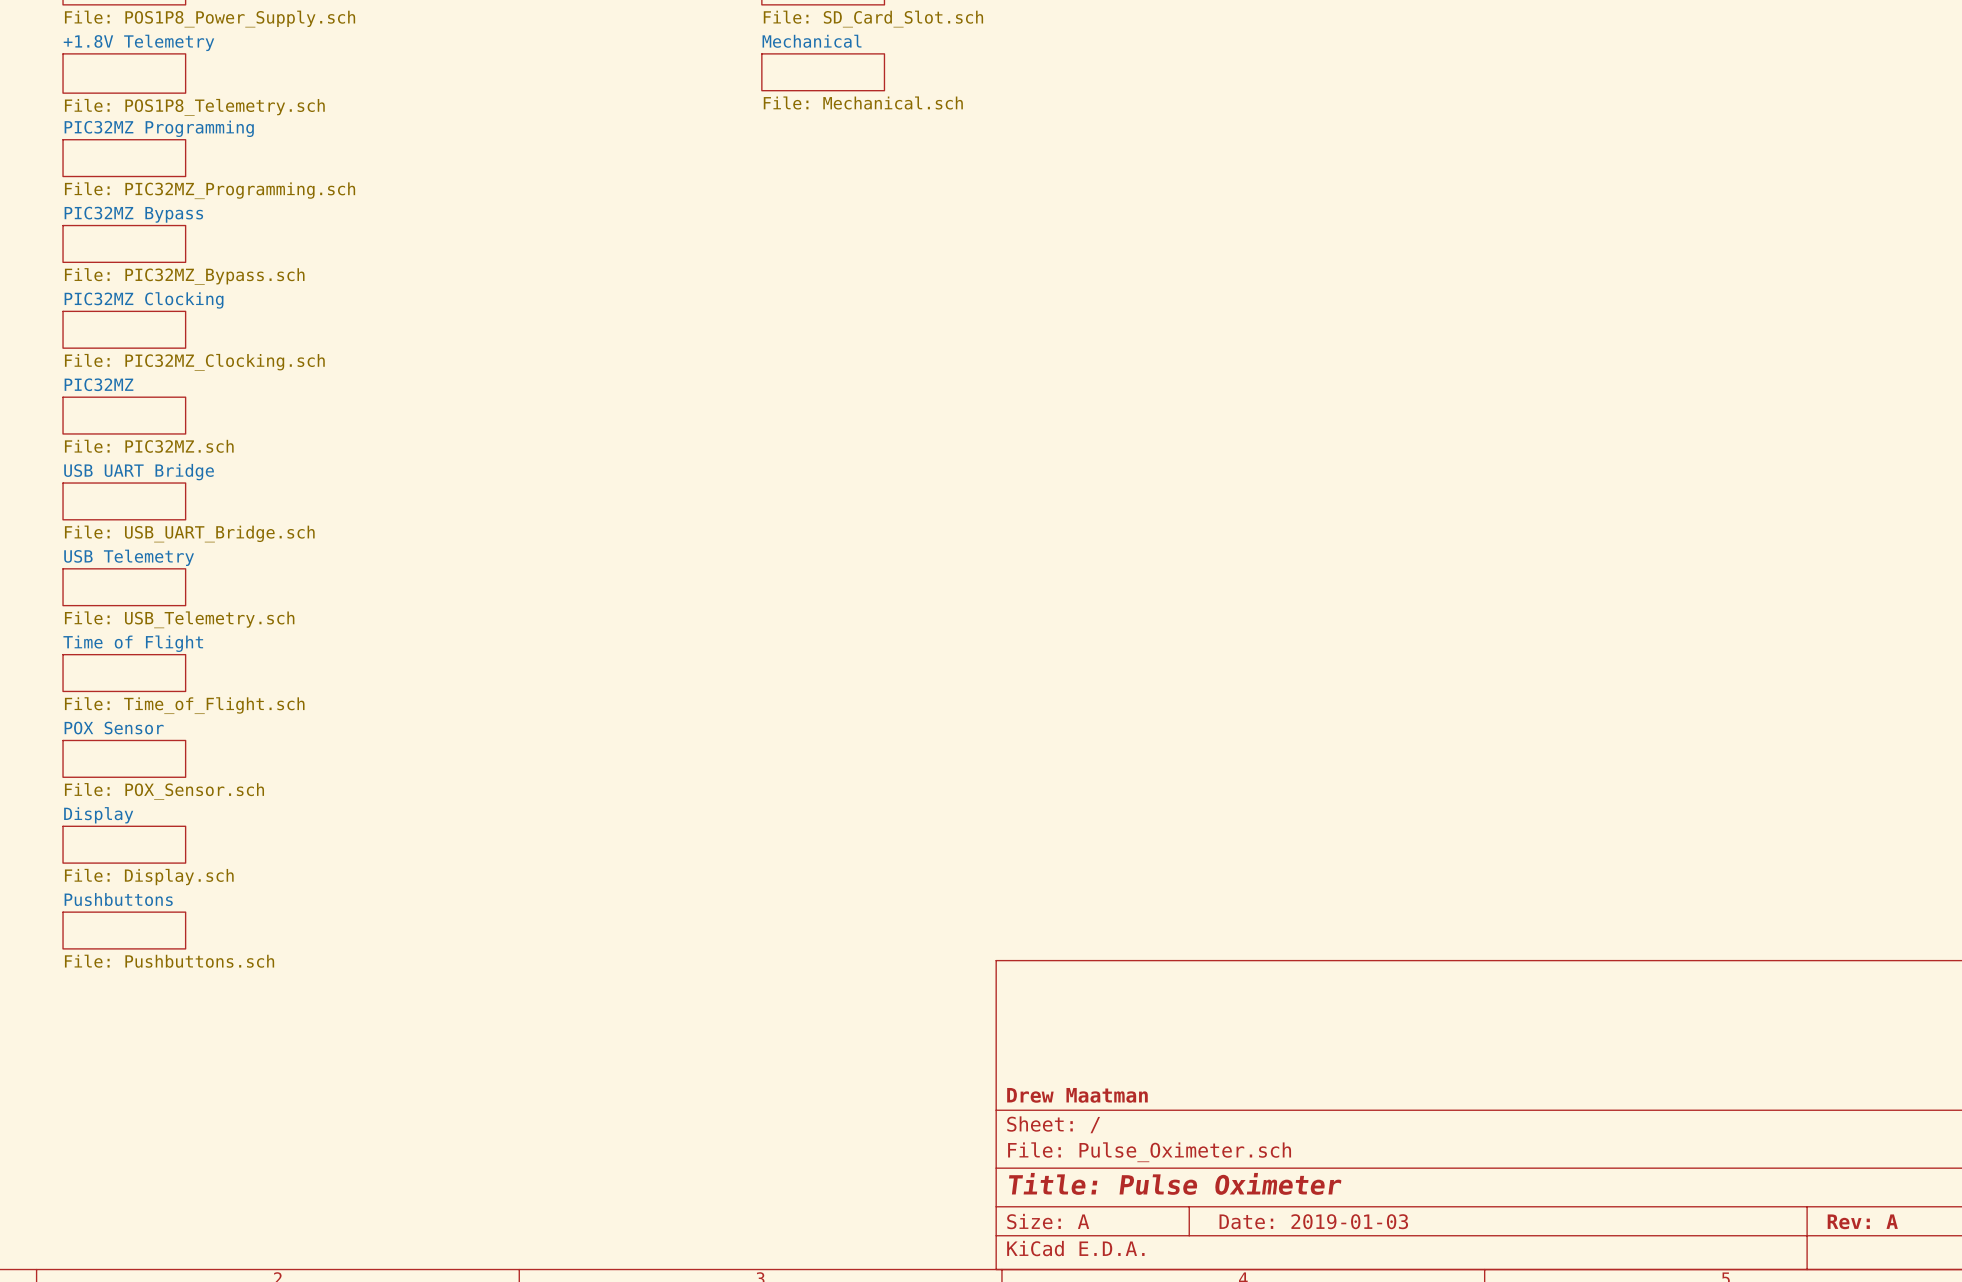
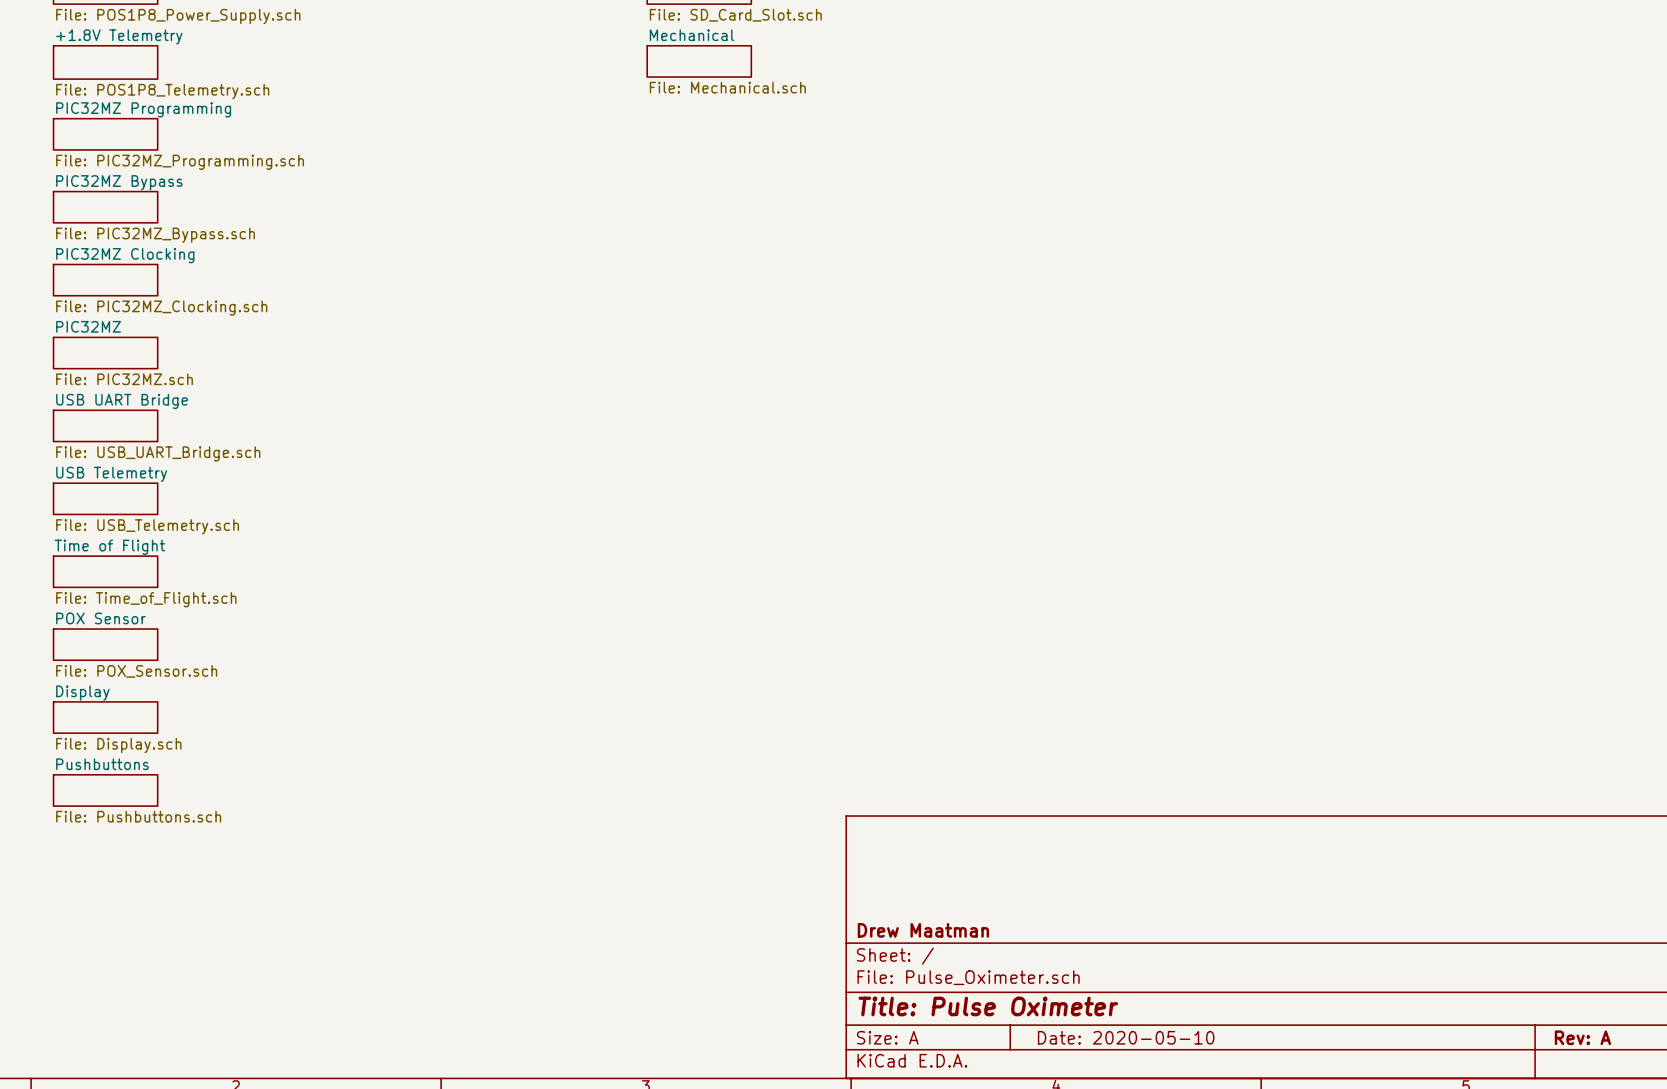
title block: Date: 2019-01-03 (1313, 1221) -> Date: 2020-05-10 (1126, 1037)

